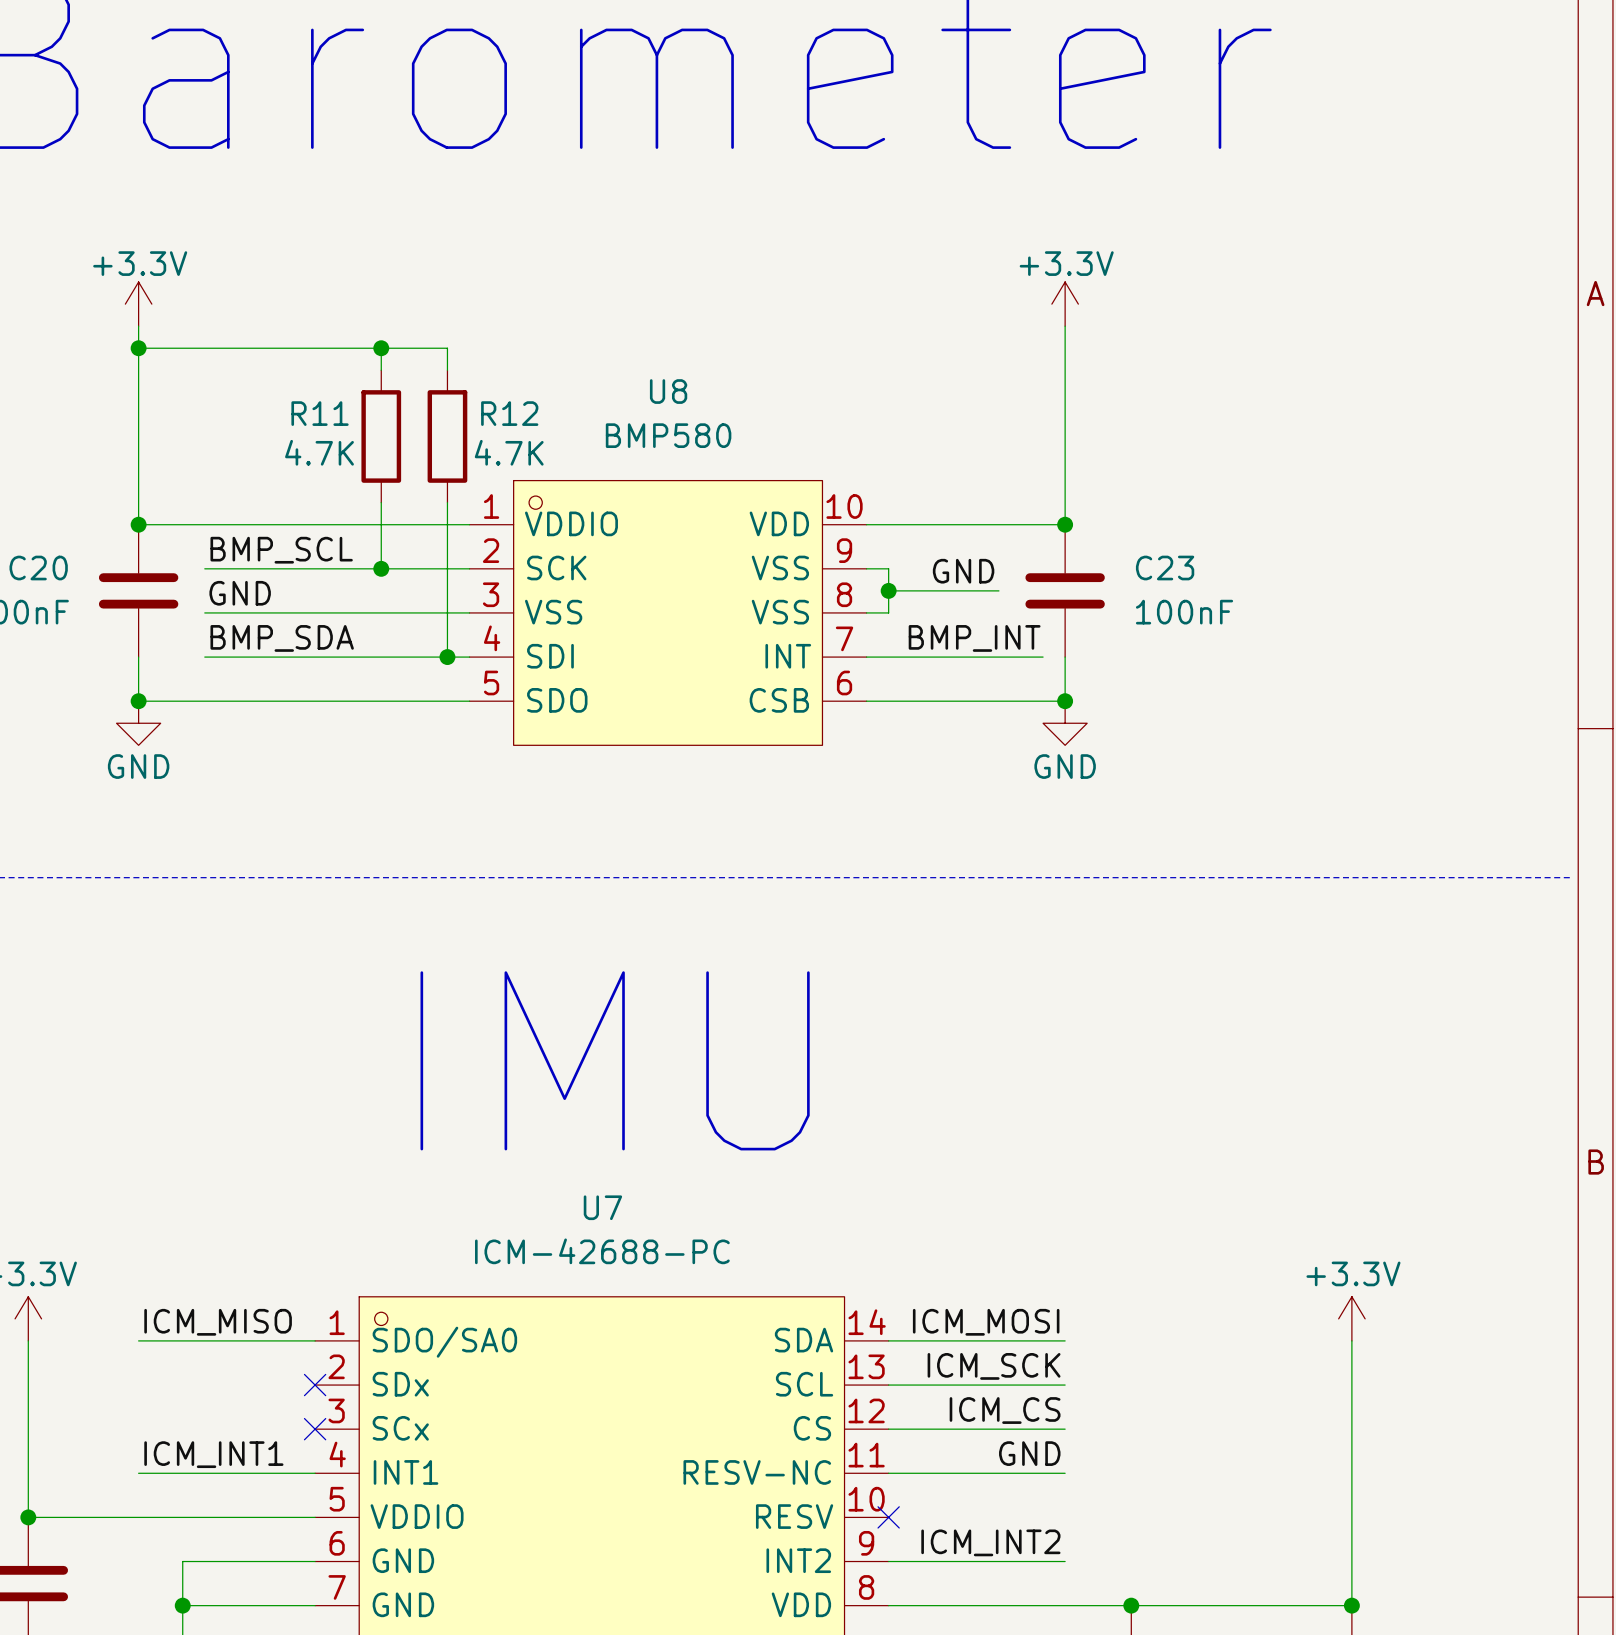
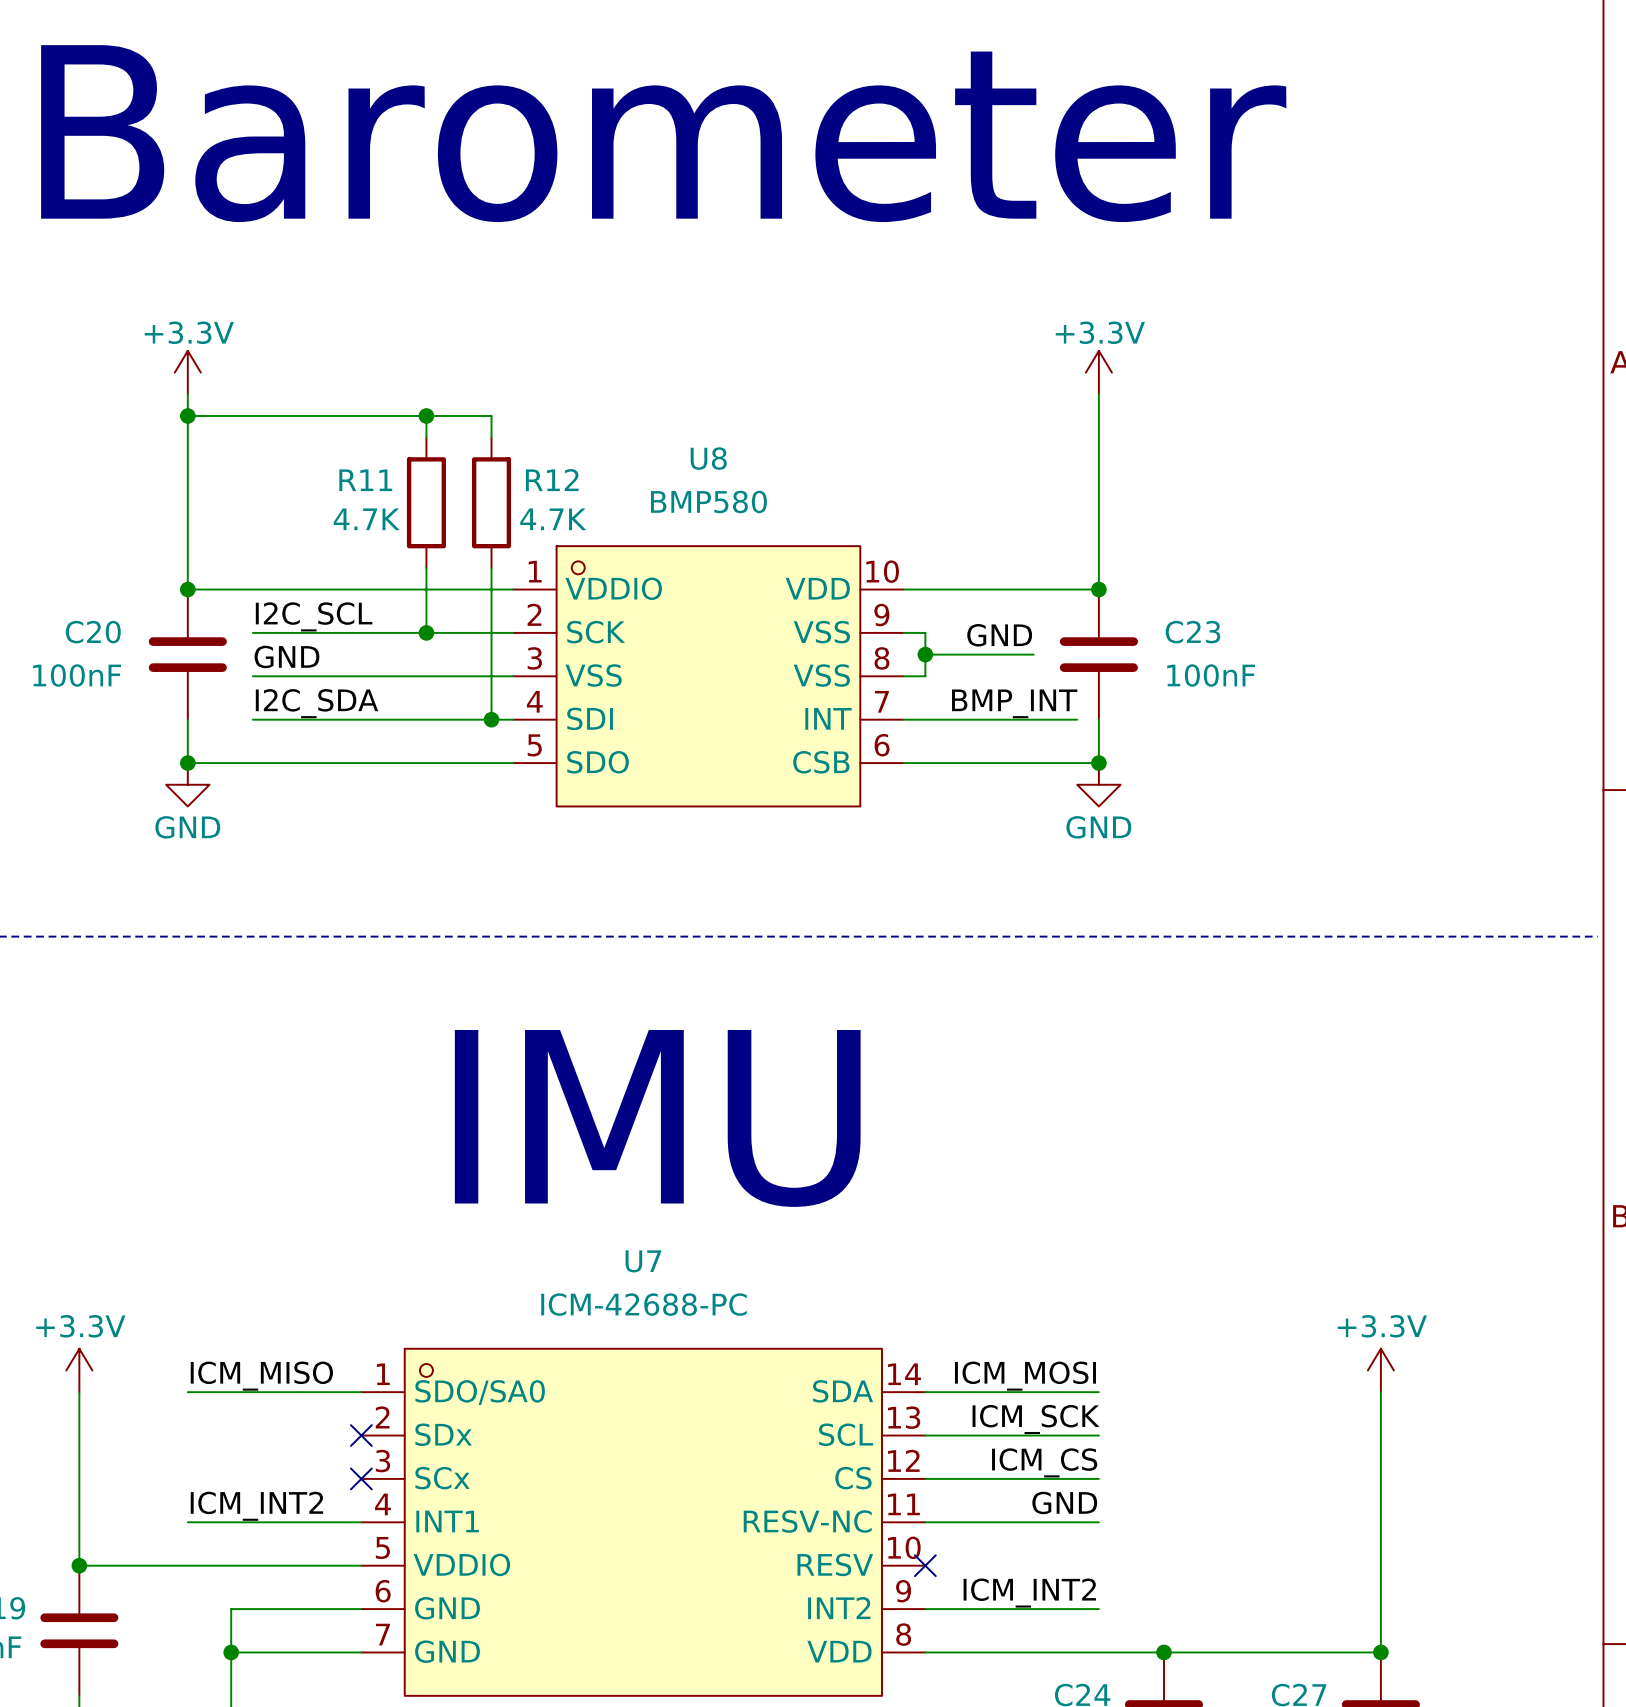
label: BMP_SCL (281, 550) -> I2C_SCL (314, 616)
label: BMP_SDA (282, 638) -> I2C_SDA (316, 703)
label: ICM_INT1 (213, 1454) -> ICM_INT2 (256, 1506)

